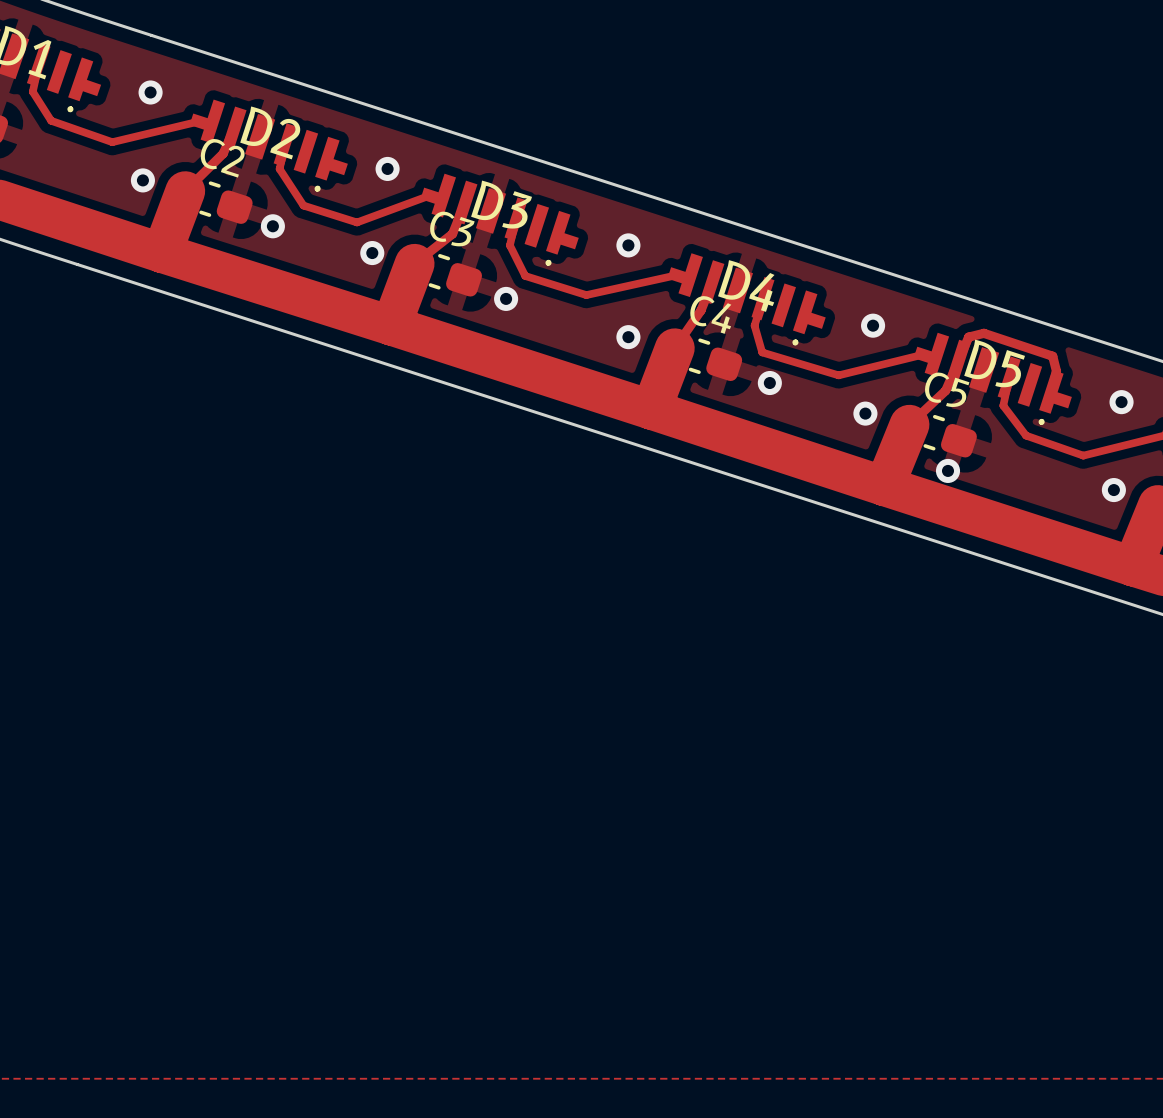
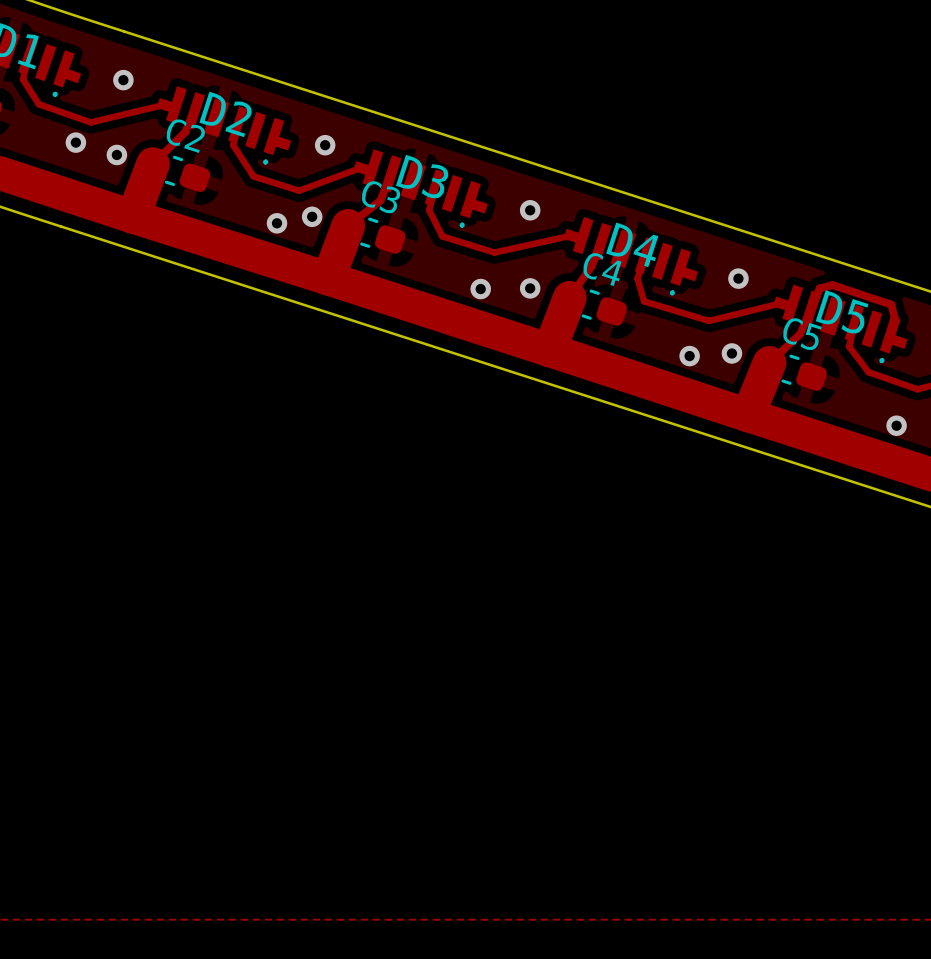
via: none -> (75, 142)
via position: (272, 226) -> (277, 223)
via position: (506, 298) -> (480, 289)
via position: (769, 383) -> (689, 356)
via: (947, 470) -> none
via: none -> (896, 425)

